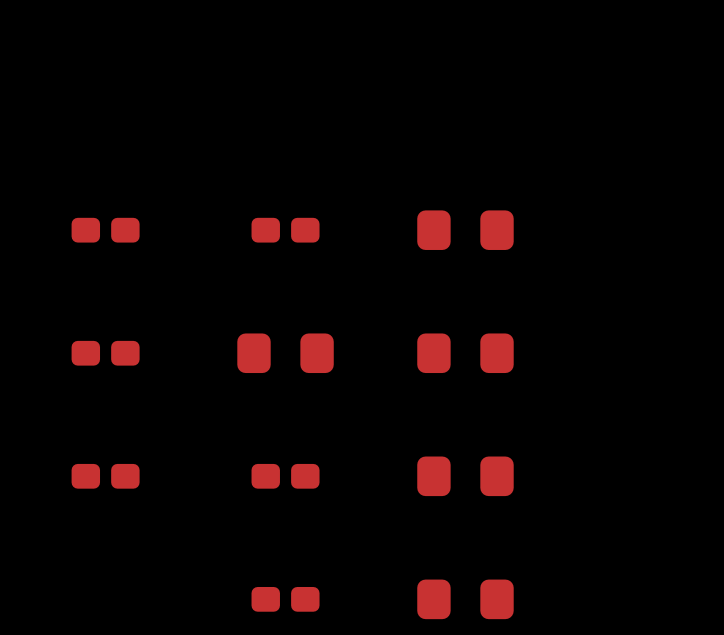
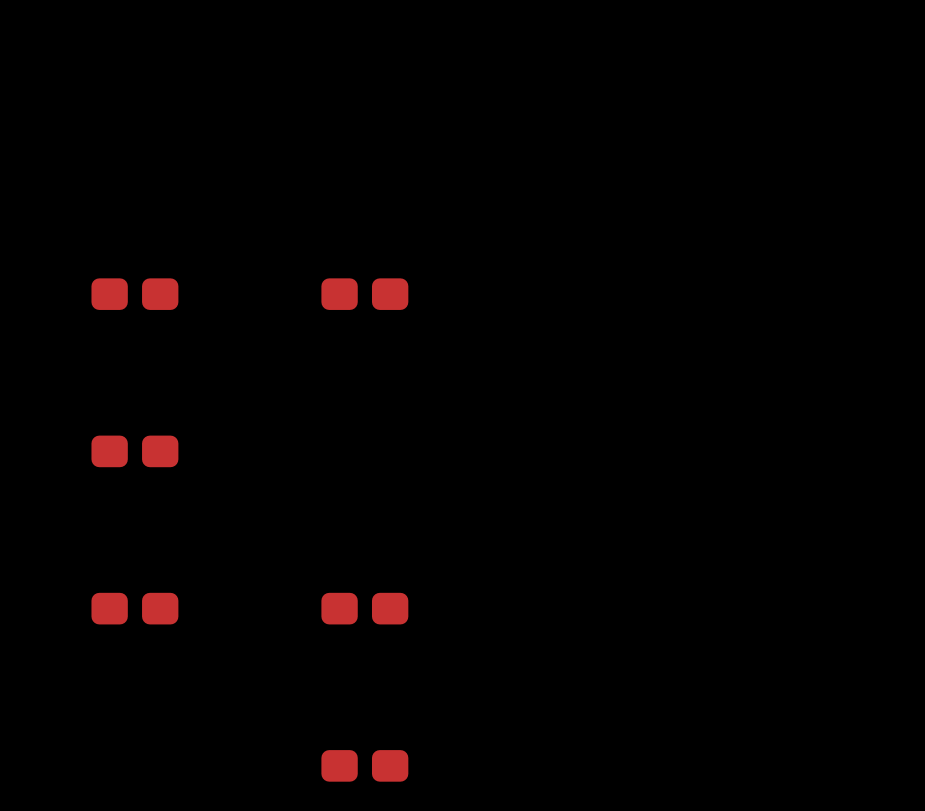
part: (465, 230) -> none
part: (285, 353) -> none
part: (465, 353) -> none
part: (465, 476) -> none
part: (465, 599) -> none

